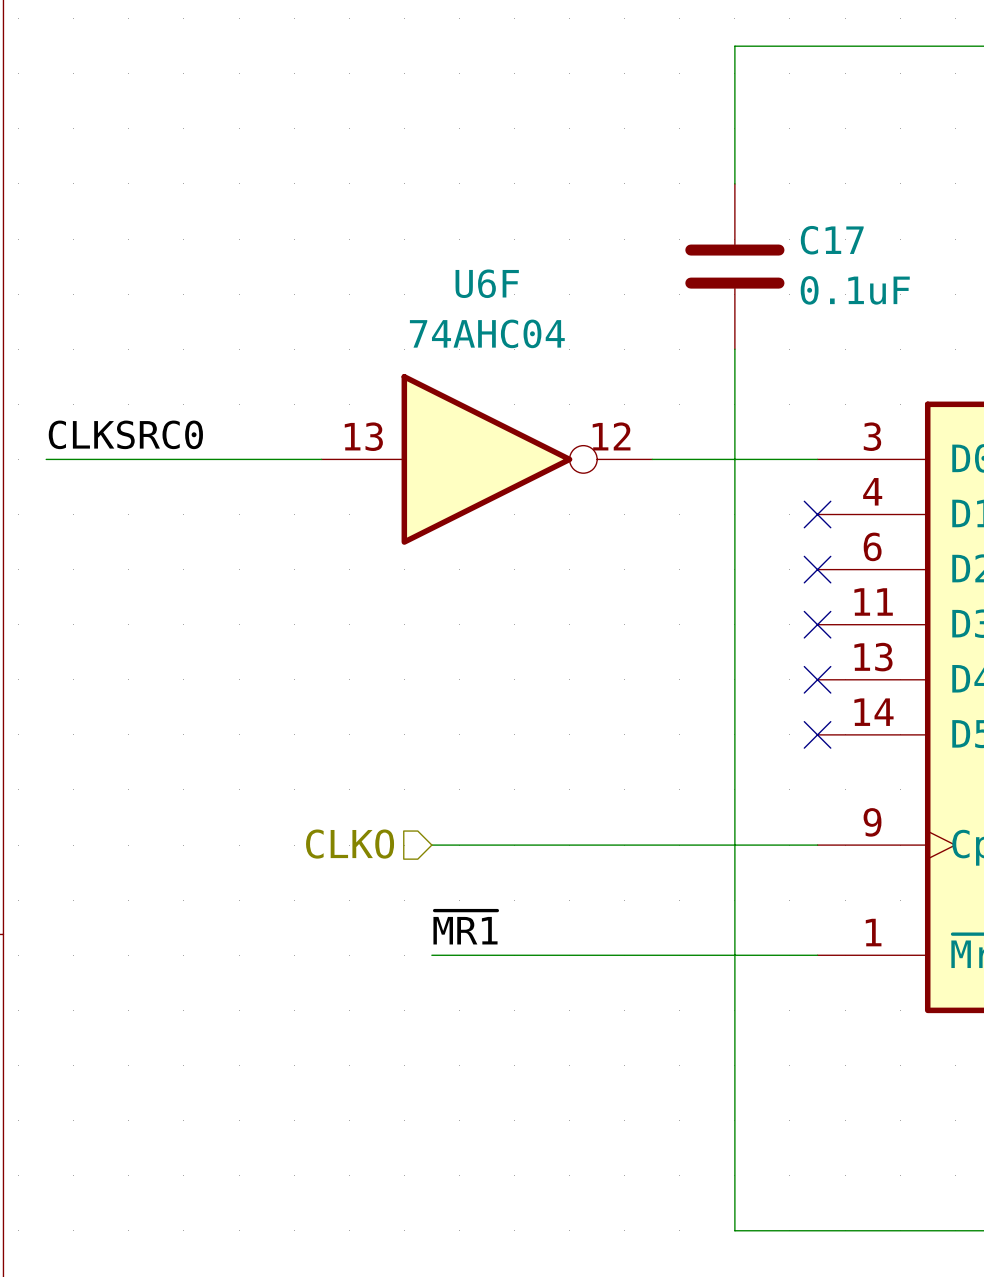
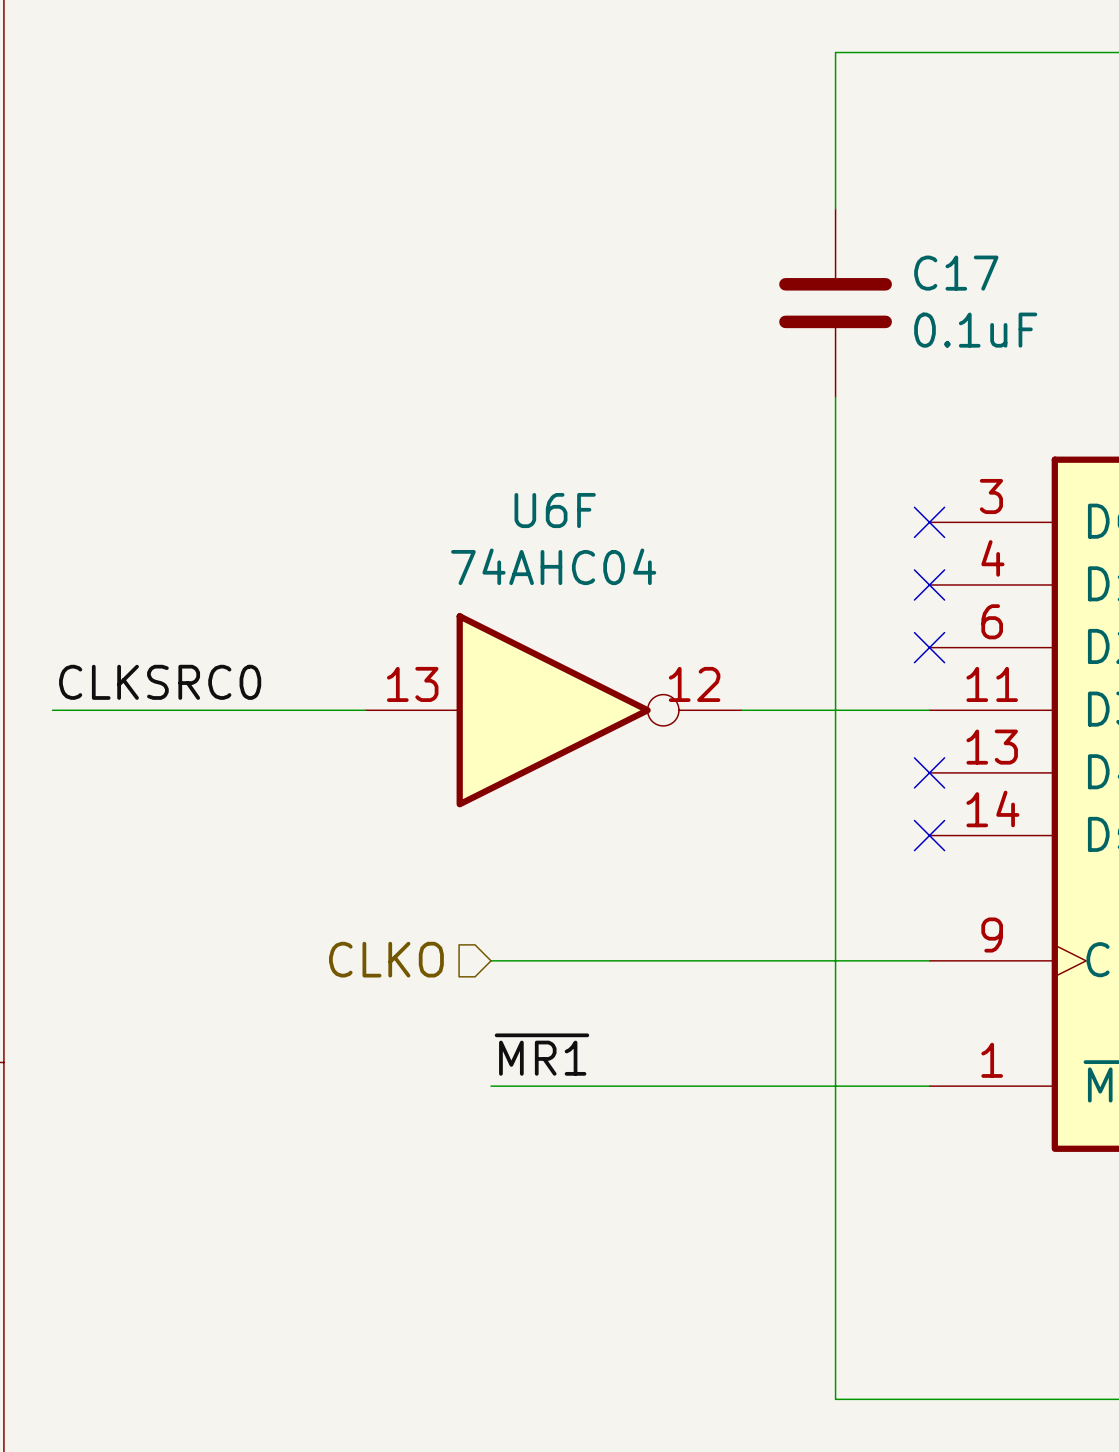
label position: CLKSRC0 (125, 434) -> CLKSRC0 (160, 682)
wire: (46, 459) (321, 459) -> (52, 710) (365, 710)
U6F position: (486, 459) -> (553, 710)
wire: (652, 459) (817, 459) -> (741, 710) (929, 710)
no-connect mark: none -> (929, 522)
no-connect mark: (817, 624) -> none

